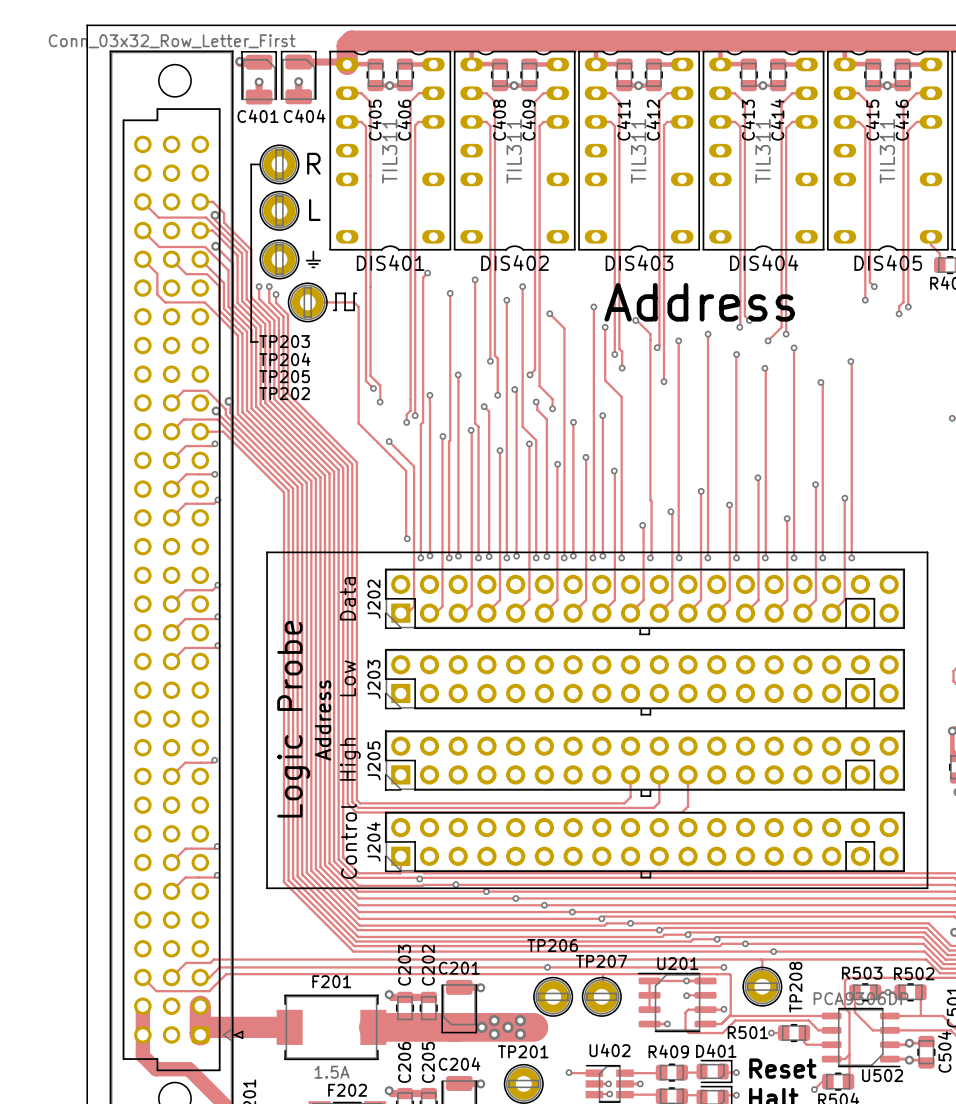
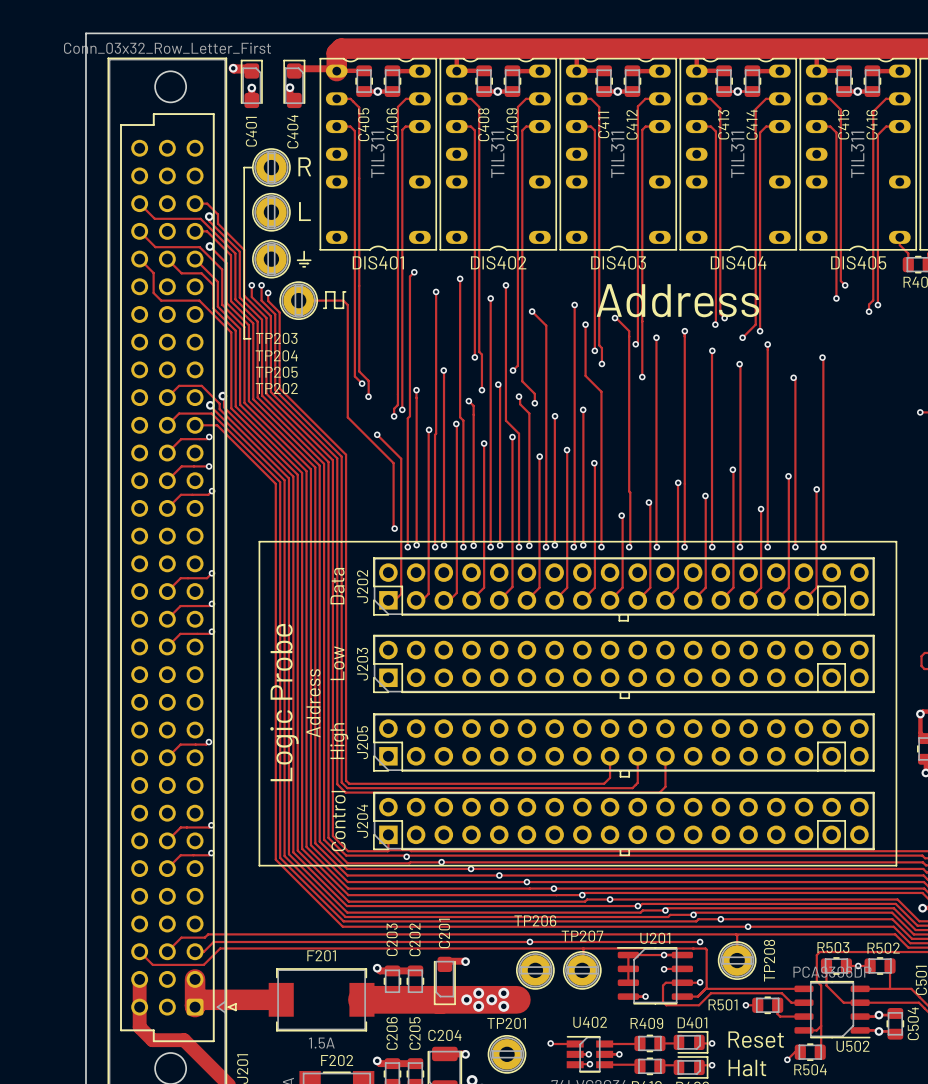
C404 footprint: [280, 50, 317, 105] -> [283, 59, 306, 109]
C401 footprint: [241, 51, 277, 105] -> [240, 59, 263, 109]
C401 name rotation: 0° (257, 116) -> 90° counterclockwise (251, 131)
C201 name rotation: 0° (459, 968) -> 90° counterclockwise (444, 933)
C201 footprint: [441, 979, 478, 1034] -> [434, 956, 456, 1005]

